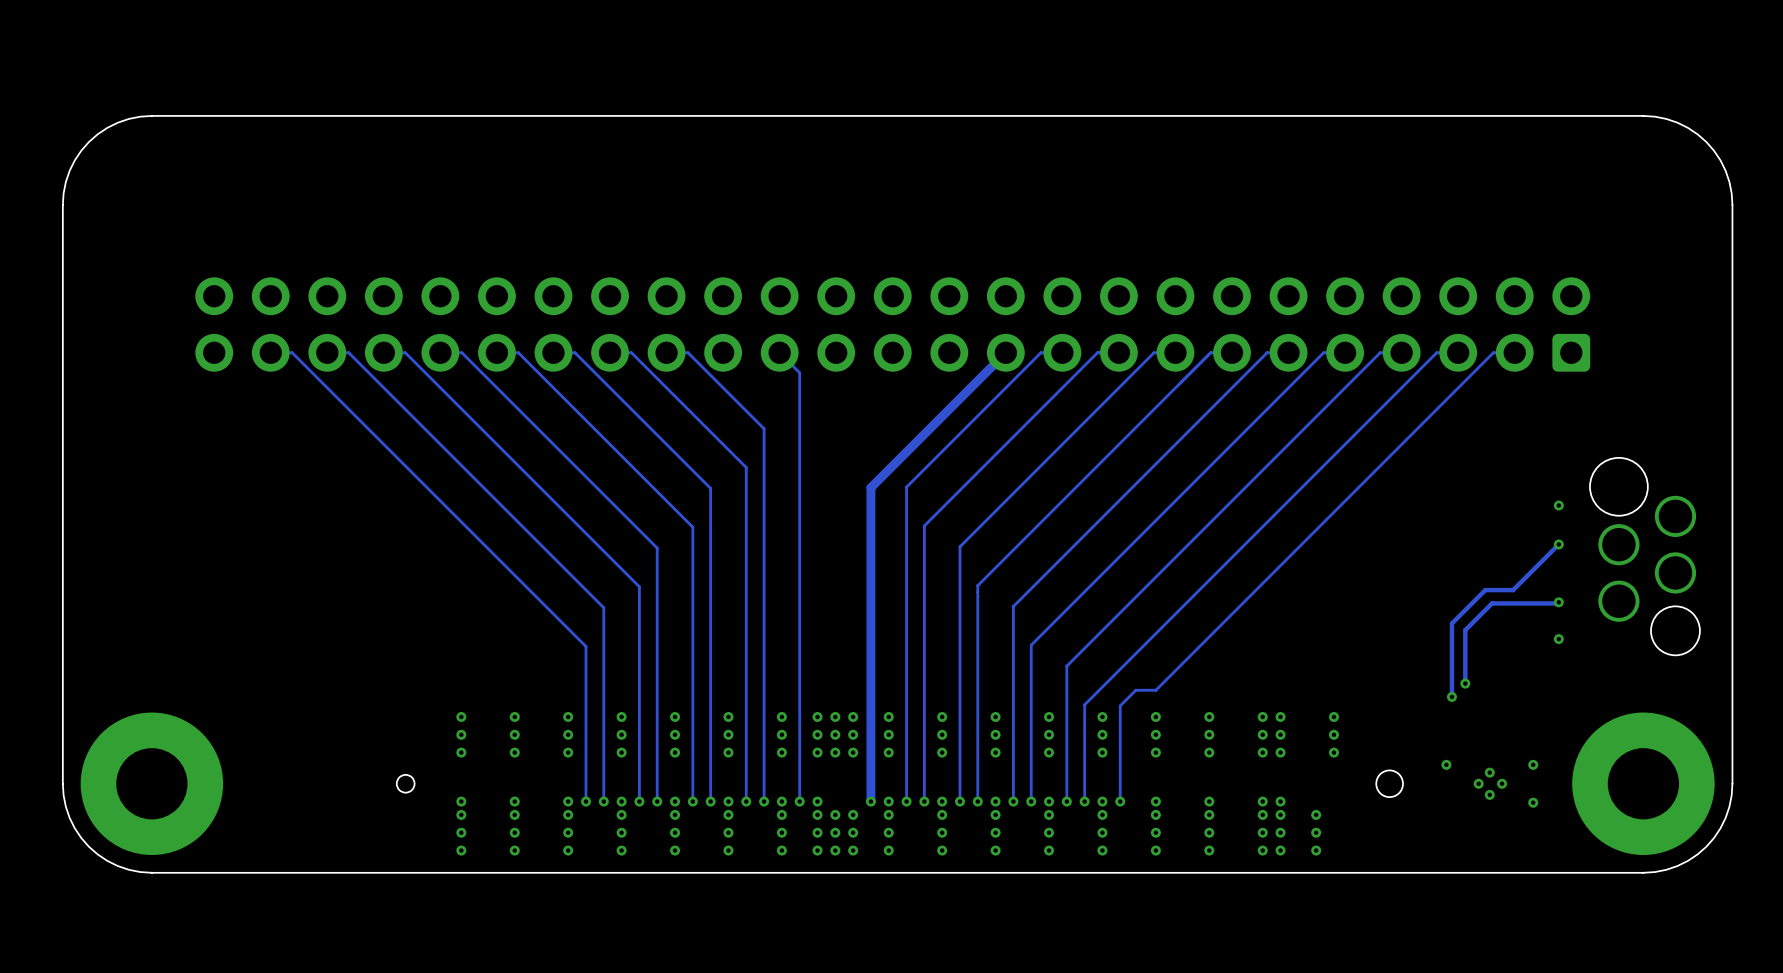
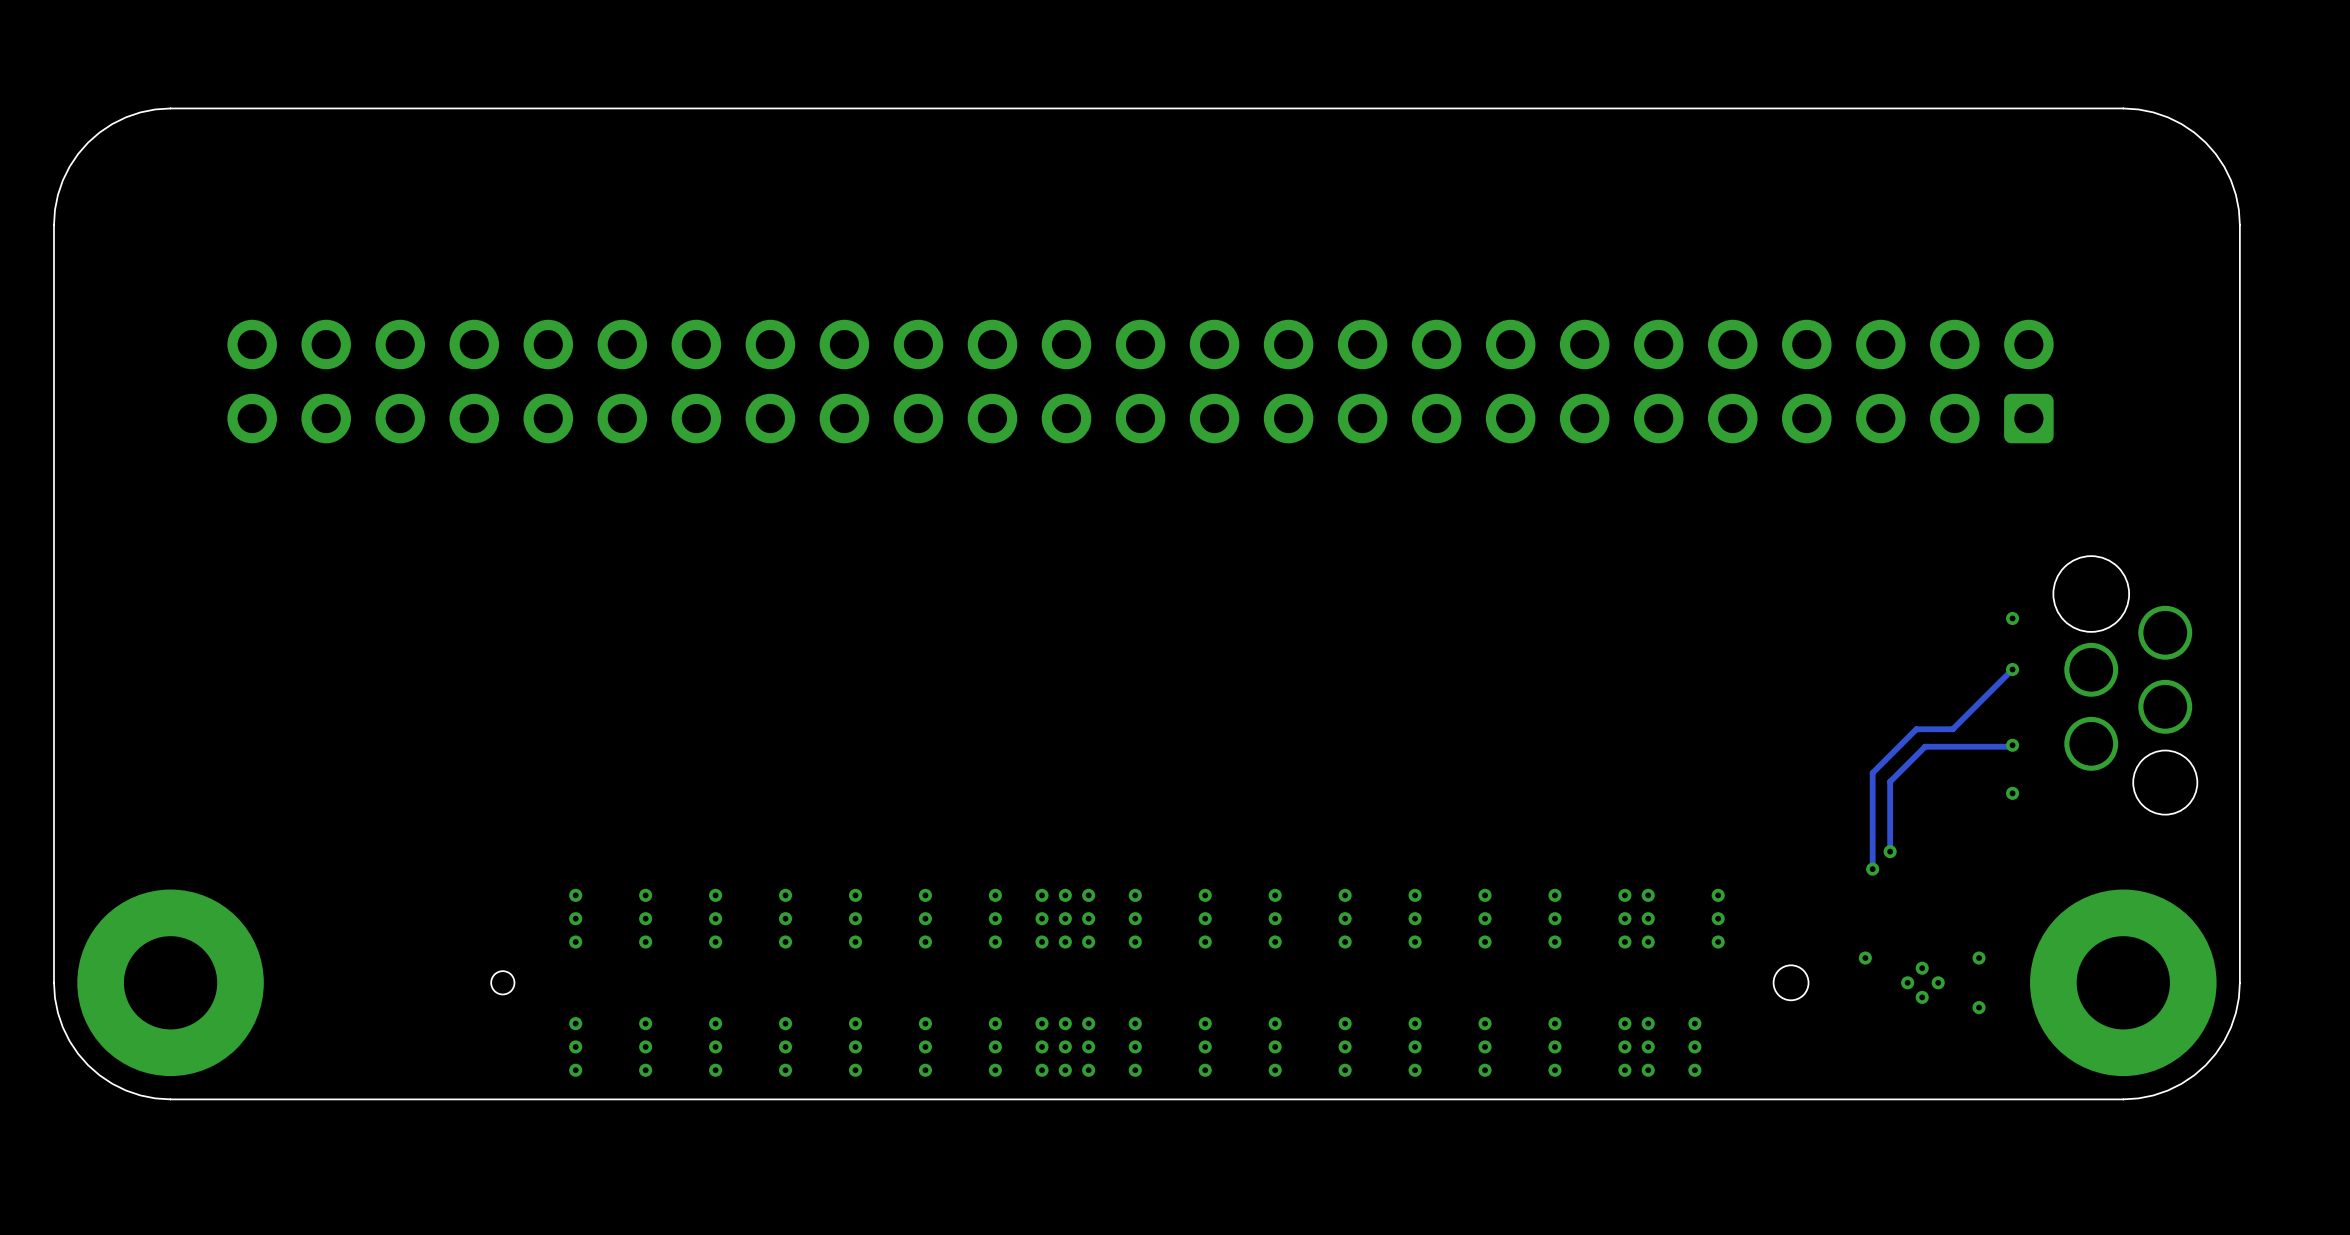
track: (270, 352) (292, 352) (585, 646) (585, 801) -> none
track: (327, 352) (348, 352) (603, 607) (603, 801) -> none
track: (383, 352) (405, 352) (639, 586) (639, 801) -> none
track: (440, 352) (461, 352) (657, 548) (657, 801) -> none
track: (496, 352) (518, 352) (692, 527) (692, 801) -> none
track: (553, 352) (574, 352) (710, 488) (710, 801) -> none
track: (610, 352) (631, 352) (746, 467) (746, 801) -> none
track: (666, 352) (688, 352) (764, 428) (764, 801) -> none
track: (779, 352) (799, 372) (799, 801) -> none
track: (1005, 352) (870, 487) (870, 801) -> none
track: (1062, 352) (1040, 352) (906, 487) (906, 801) -> none
track: (1118, 352) (1097, 352) (924, 525) (924, 801) -> none
track: (1175, 352) (1153, 352) (959, 546) (959, 801) -> none
track: (1232, 352) (1210, 352) (977, 585) (977, 801) -> none
track: (1288, 352) (1267, 352) (1013, 606) (1013, 801) -> none
track: (1345, 352) (1323, 352) (1031, 645) (1031, 801) -> none
track: (1401, 352) (1380, 352) (1066, 666) (1066, 801) -> none
track: (1458, 352) (1436, 352) (1084, 704) (1084, 801) -> none
track: (1514, 352) (1493, 352) (1155, 690) (1135, 690) (1120, 705) (1120, 801) -> none
via: (461, 801) -> none
via: (514, 801) -> none
via: (568, 801) -> none
via: (585, 801) -> none
via: (603, 801) -> none
via: (621, 801) -> none
via: (639, 801) -> none
via: (657, 801) -> none
via: (675, 801) -> none
via: (692, 801) -> none
via: (710, 801) -> none
via: (728, 801) -> none
via: (746, 801) -> none
via: (764, 801) -> none
via: (781, 801) -> none
via: (799, 801) -> none
via: (817, 801) -> none
via: (870, 801) -> none
via: (888, 801) -> none
via: (906, 801) -> none
via: (924, 801) -> none
via: (942, 801) -> none
via: (959, 801) -> none
via: (977, 801) -> none
via: (995, 801) -> none
via: (1013, 801) -> none
via: (1031, 801) -> none
via: (1049, 801) -> none
via: (1066, 801) -> none
via: (1084, 801) -> none
via: (1102, 801) -> none
via: (1120, 801) -> none
via: (1155, 801) -> none
via: (1209, 801) -> none
via: (1262, 801) -> none
via: (1280, 801) -> none

